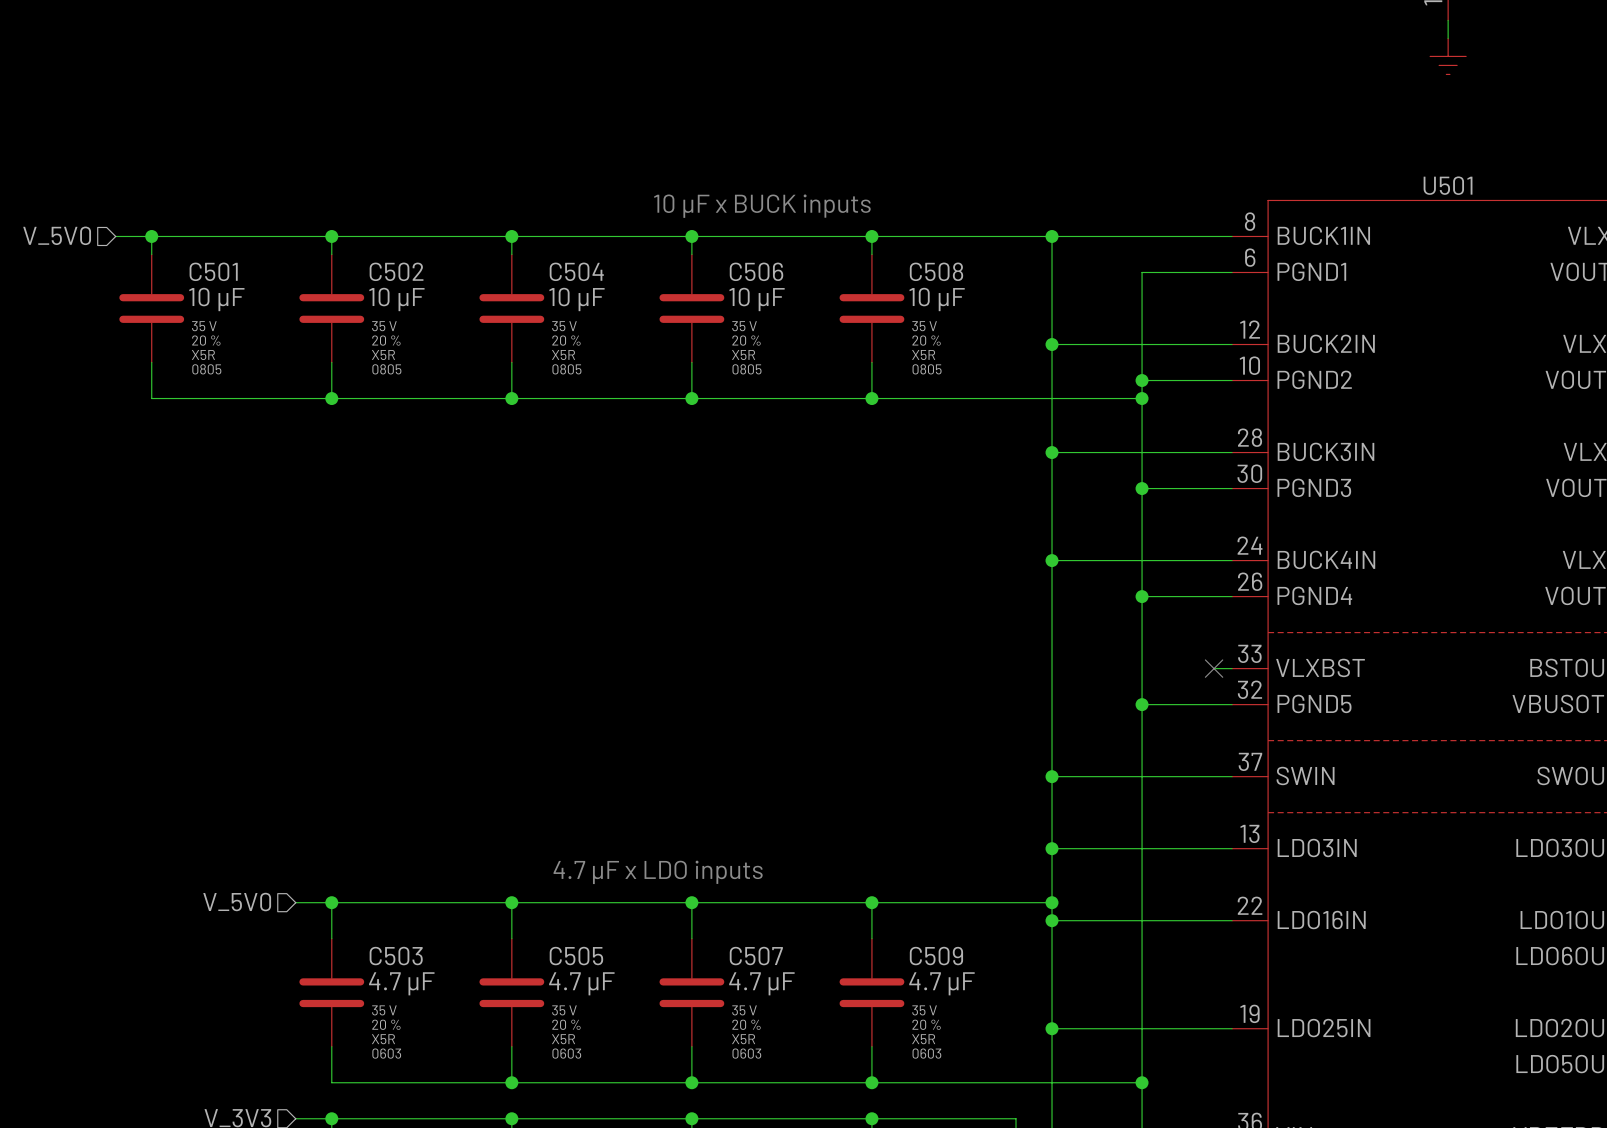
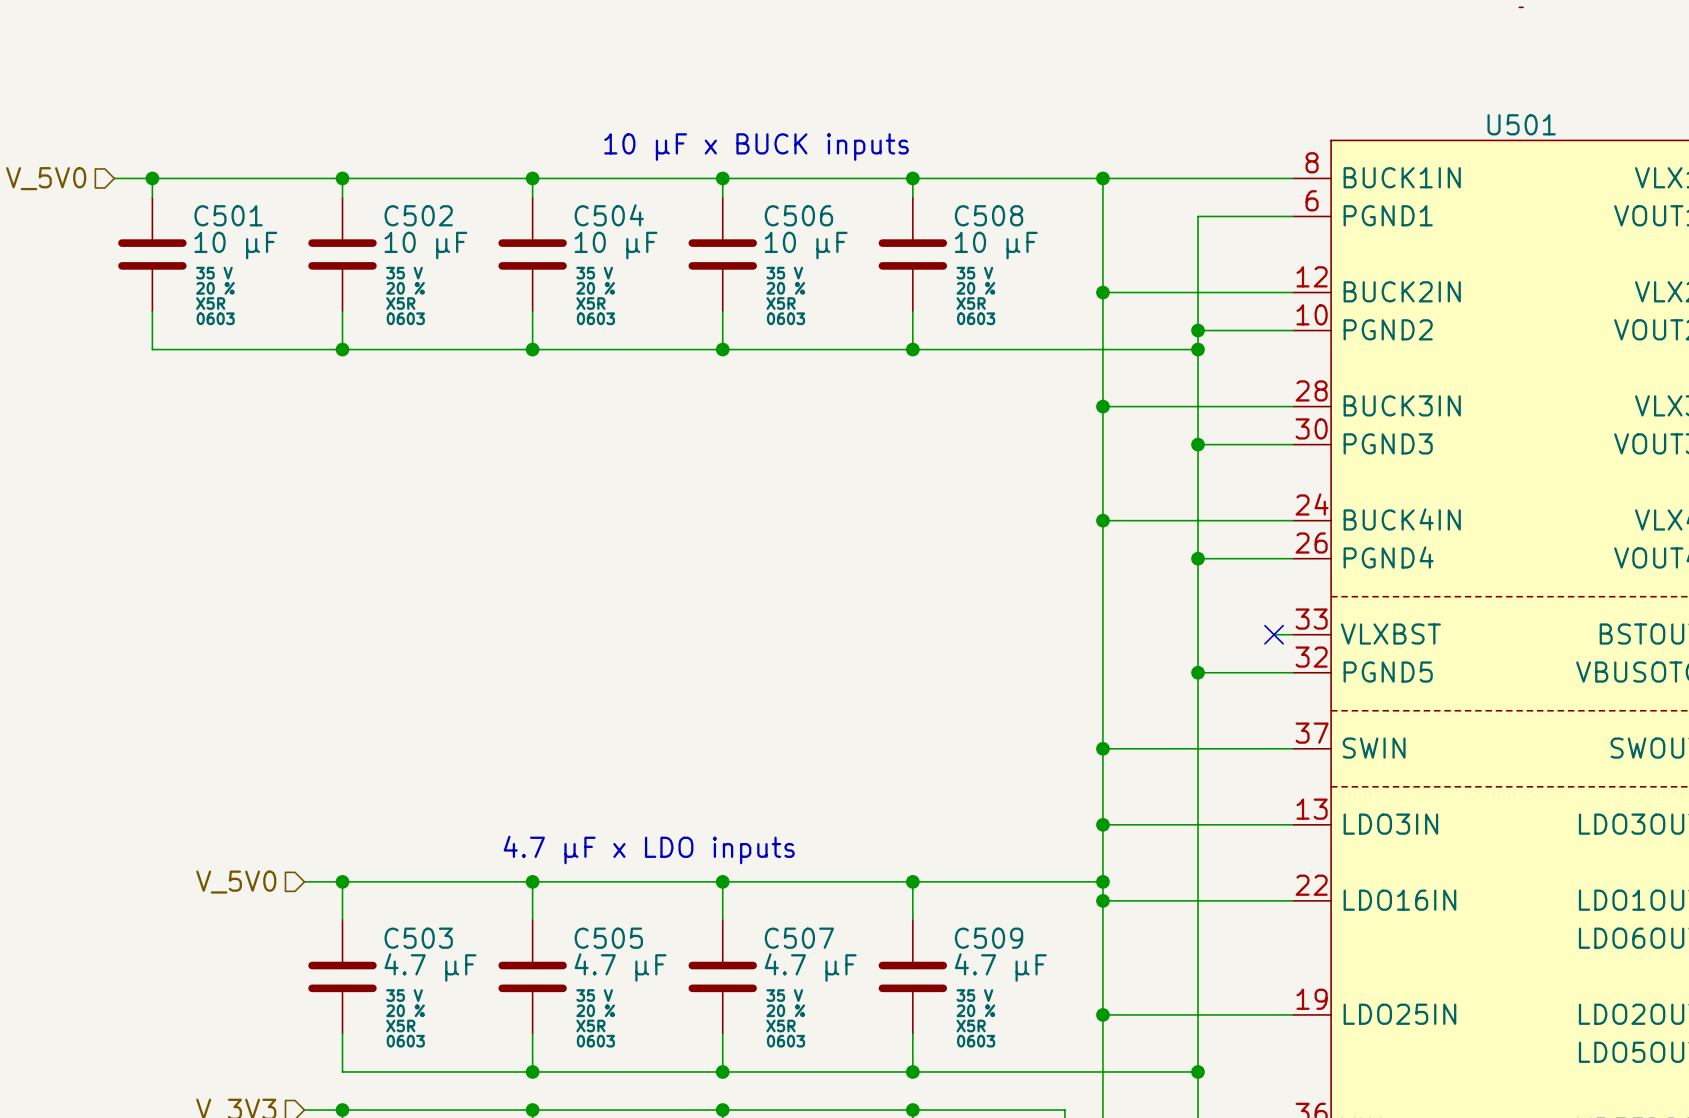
C501 text: 0805 (206, 369) -> 0603 (215, 318)
C502 text: 0805 (386, 369) -> 0603 (405, 318)
C504 text: 0805 (566, 369) -> 0603 (595, 318)
C506 text: 0805 (747, 369) -> 0603 (786, 318)
C508 text: 0805 (927, 369) -> 0603 (976, 318)

